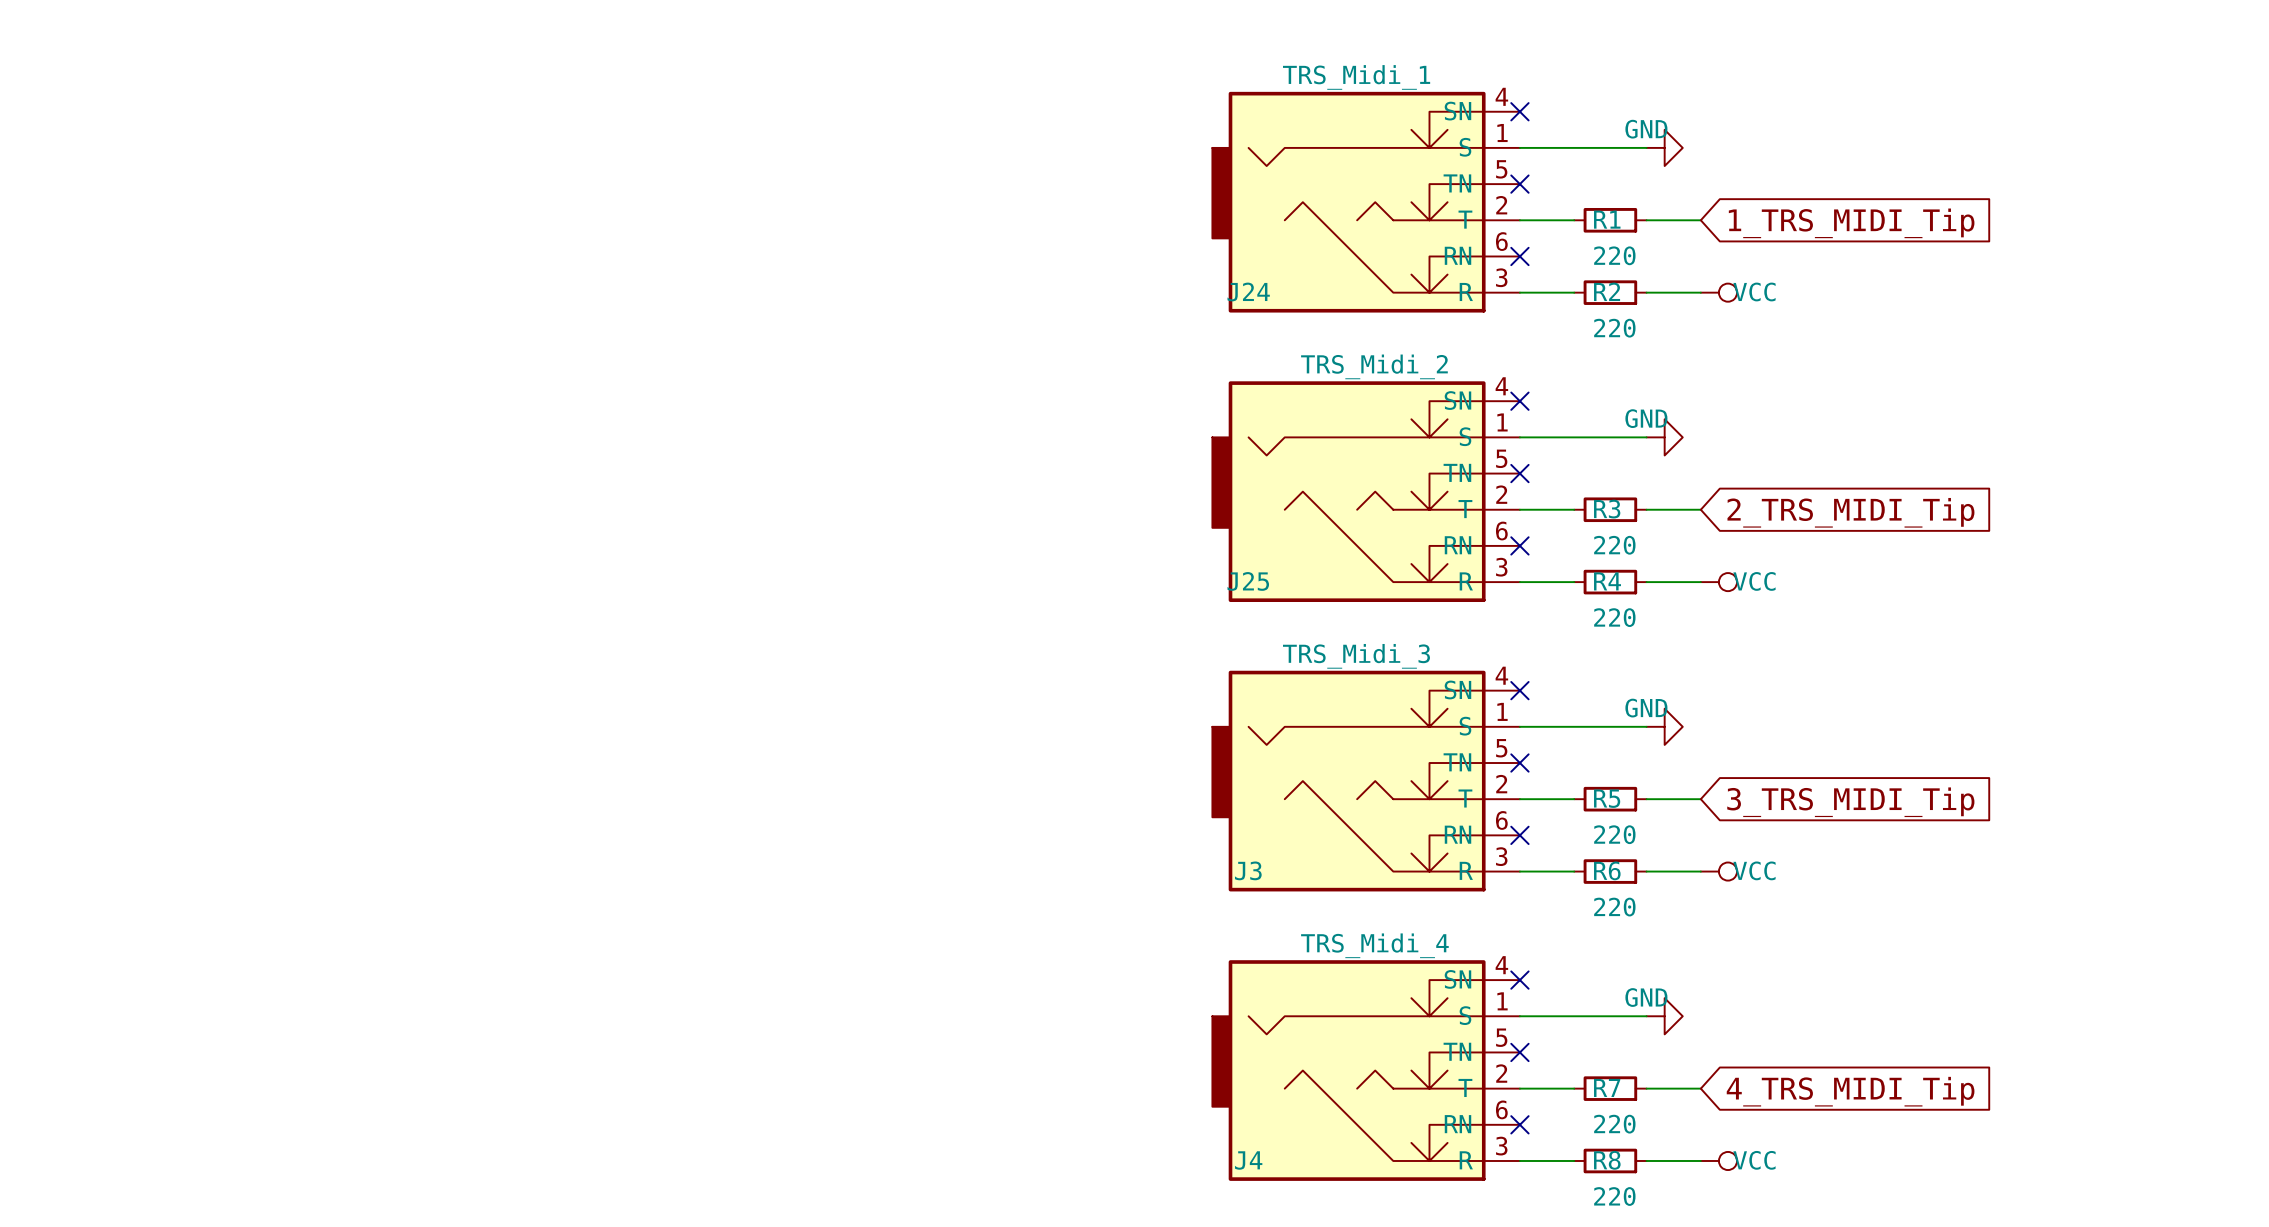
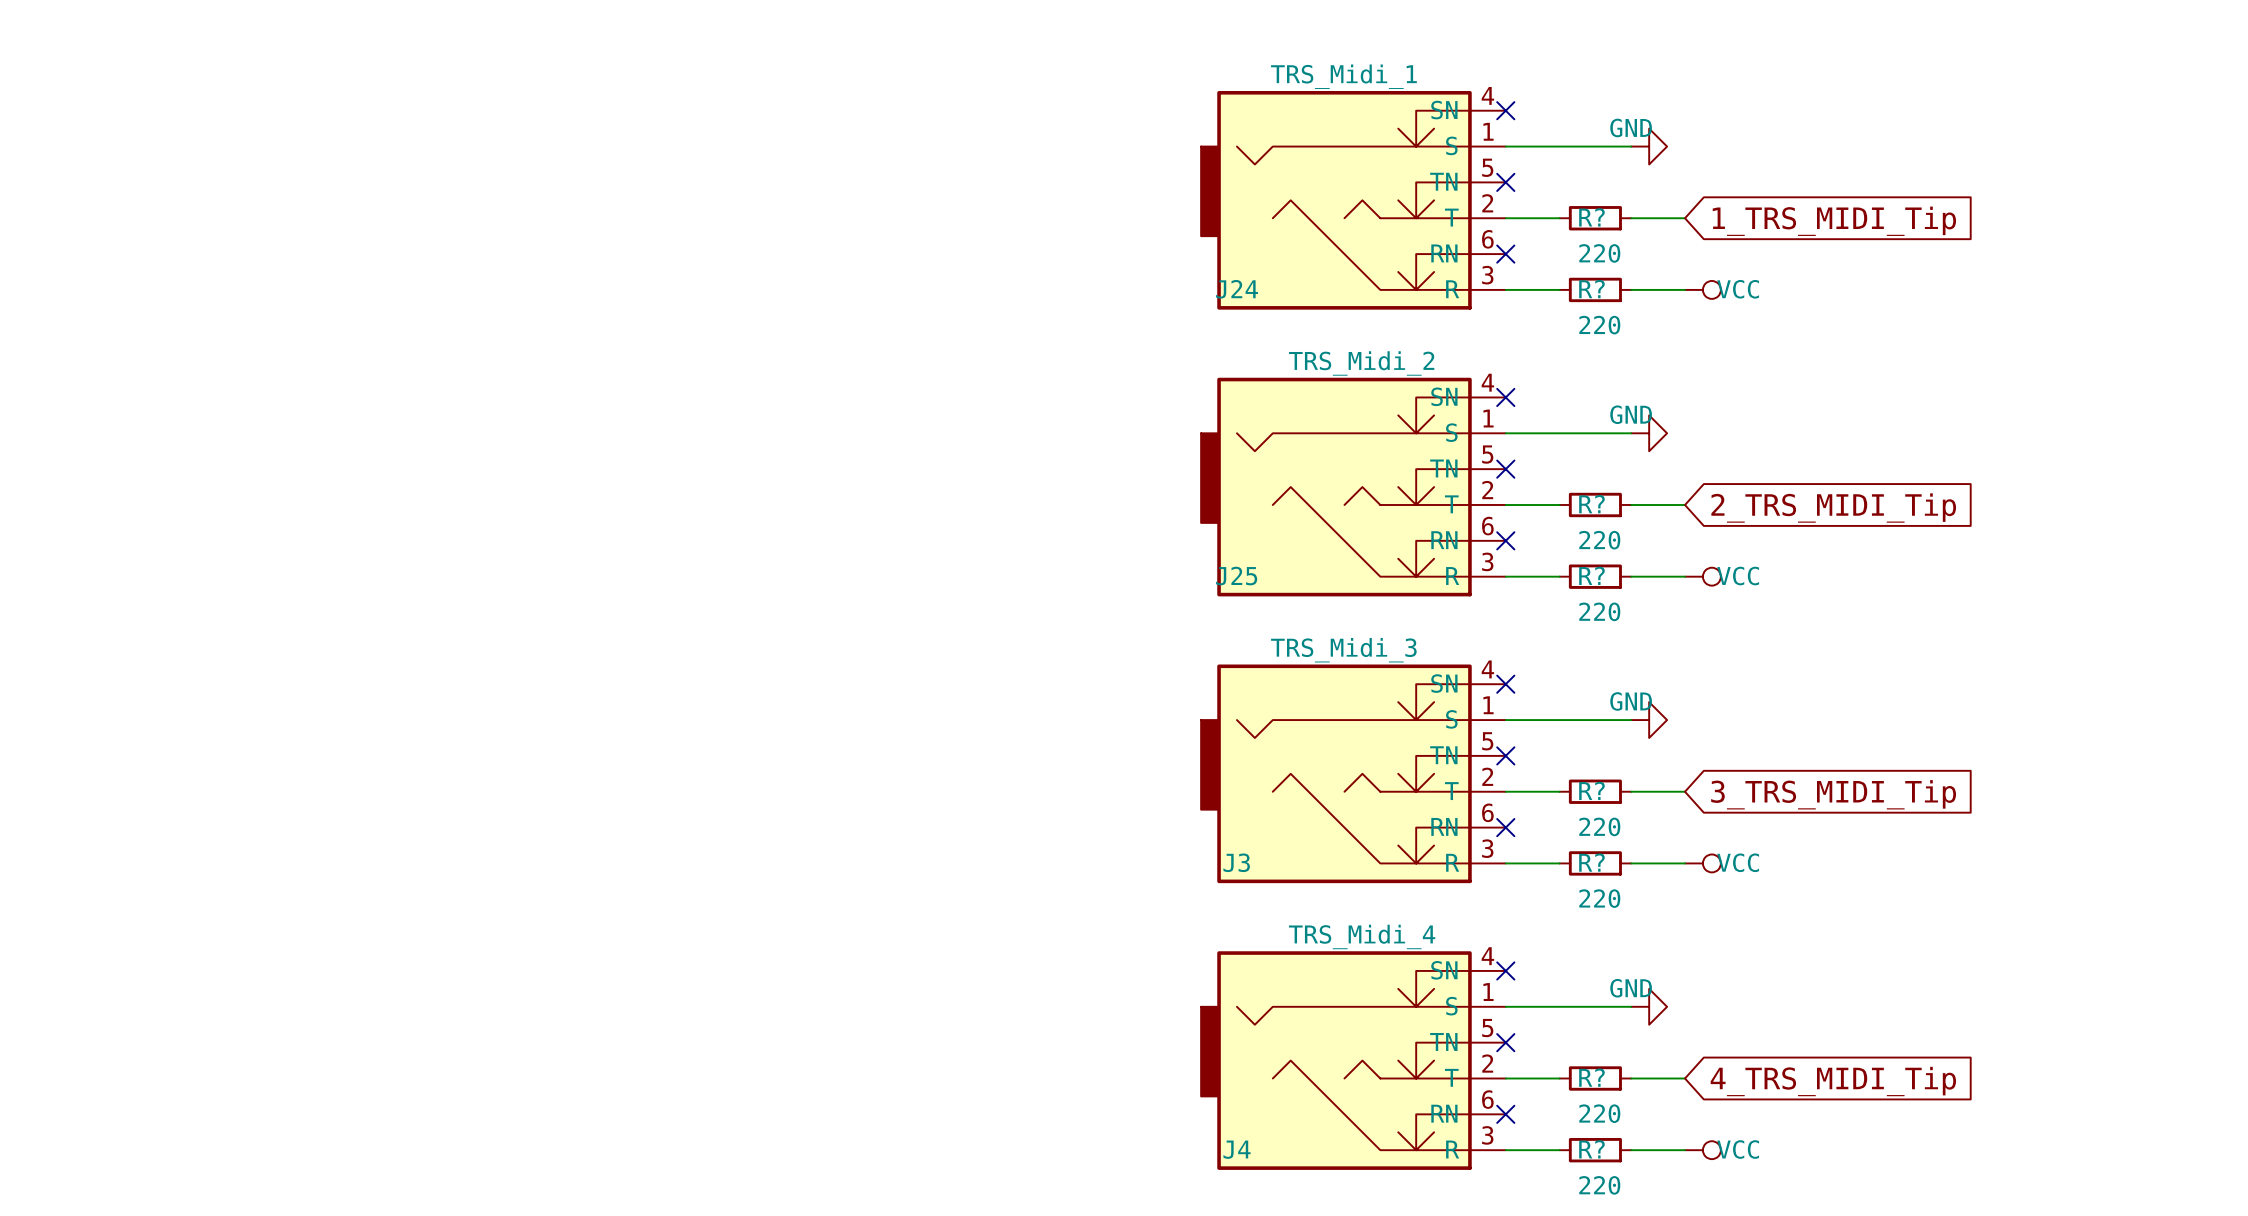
R1 name: R1 (1607, 219) -> R? (1591, 217)
R2 name: R2 (1607, 291) -> R? (1591, 289)
R3 name: R3 (1607, 509) -> R? (1591, 504)
R4 name: R4 (1607, 581) -> R? (1591, 575)
R5 name: R5 (1607, 798) -> R? (1591, 790)
R6 name: R6 (1607, 870) -> R? (1591, 862)
R7 name: R7 (1607, 1087) -> R? (1591, 1077)
R8 name: R8 (1607, 1160) -> R? (1591, 1149)

